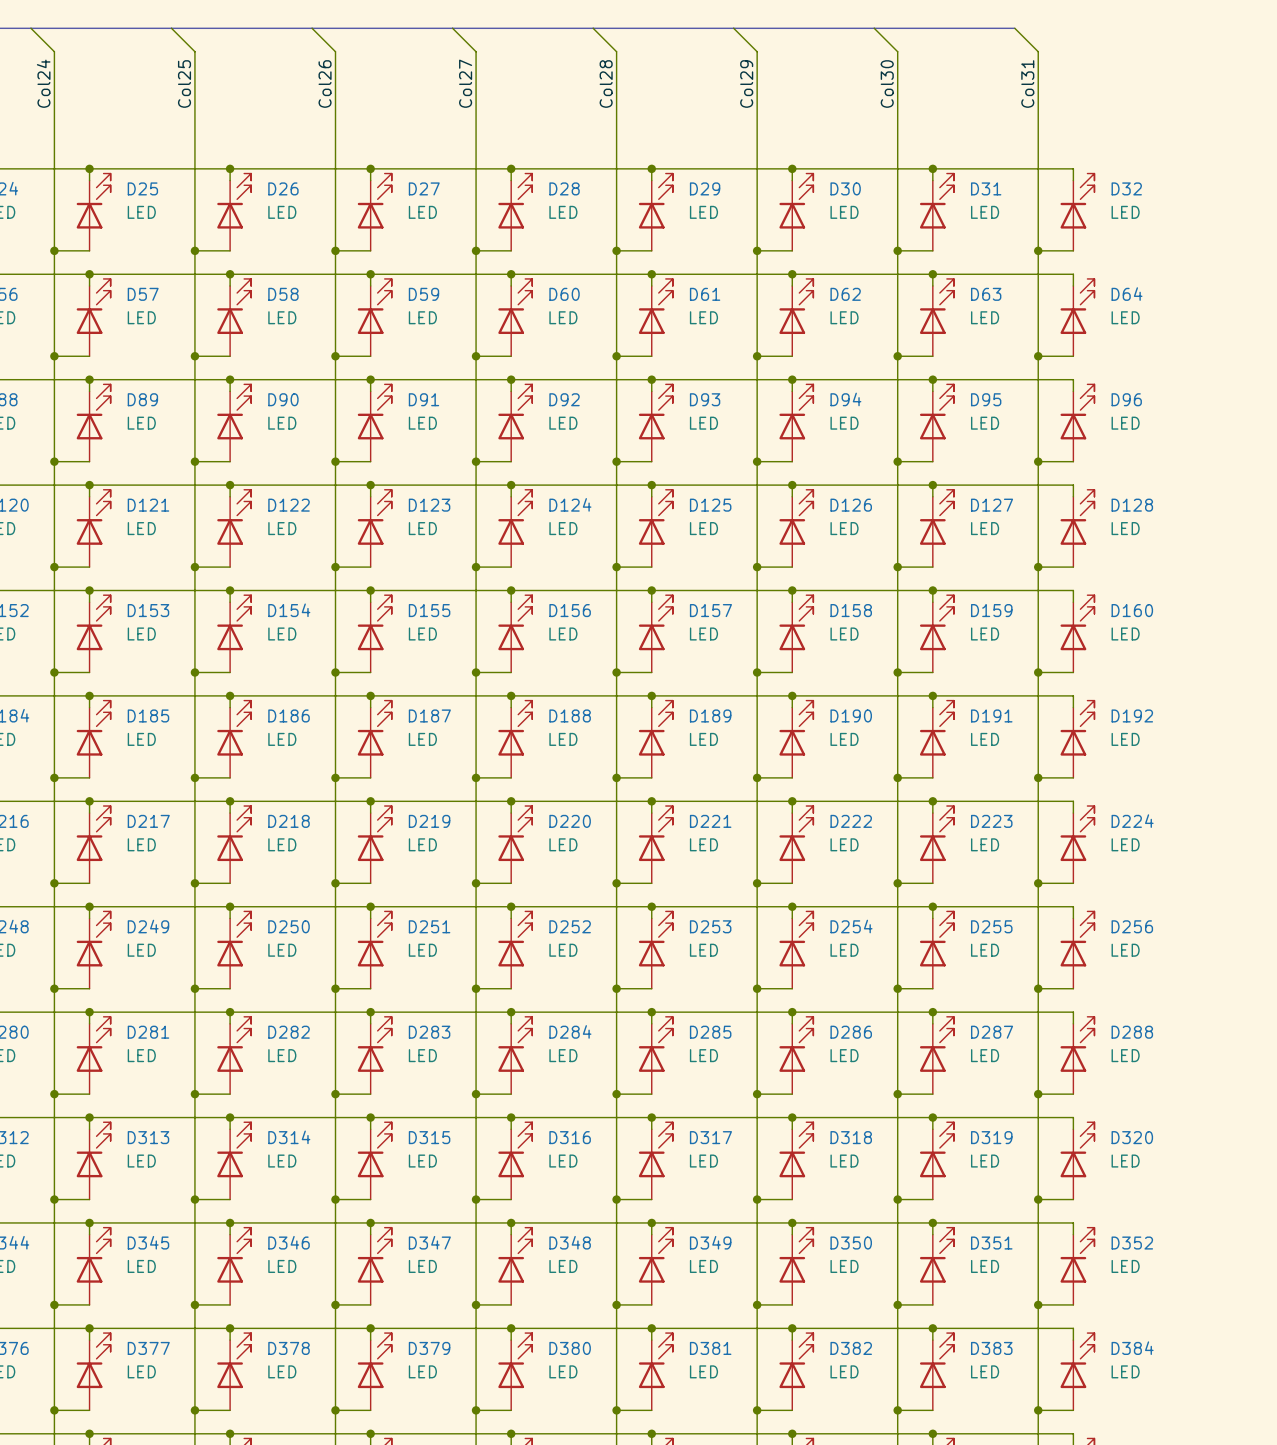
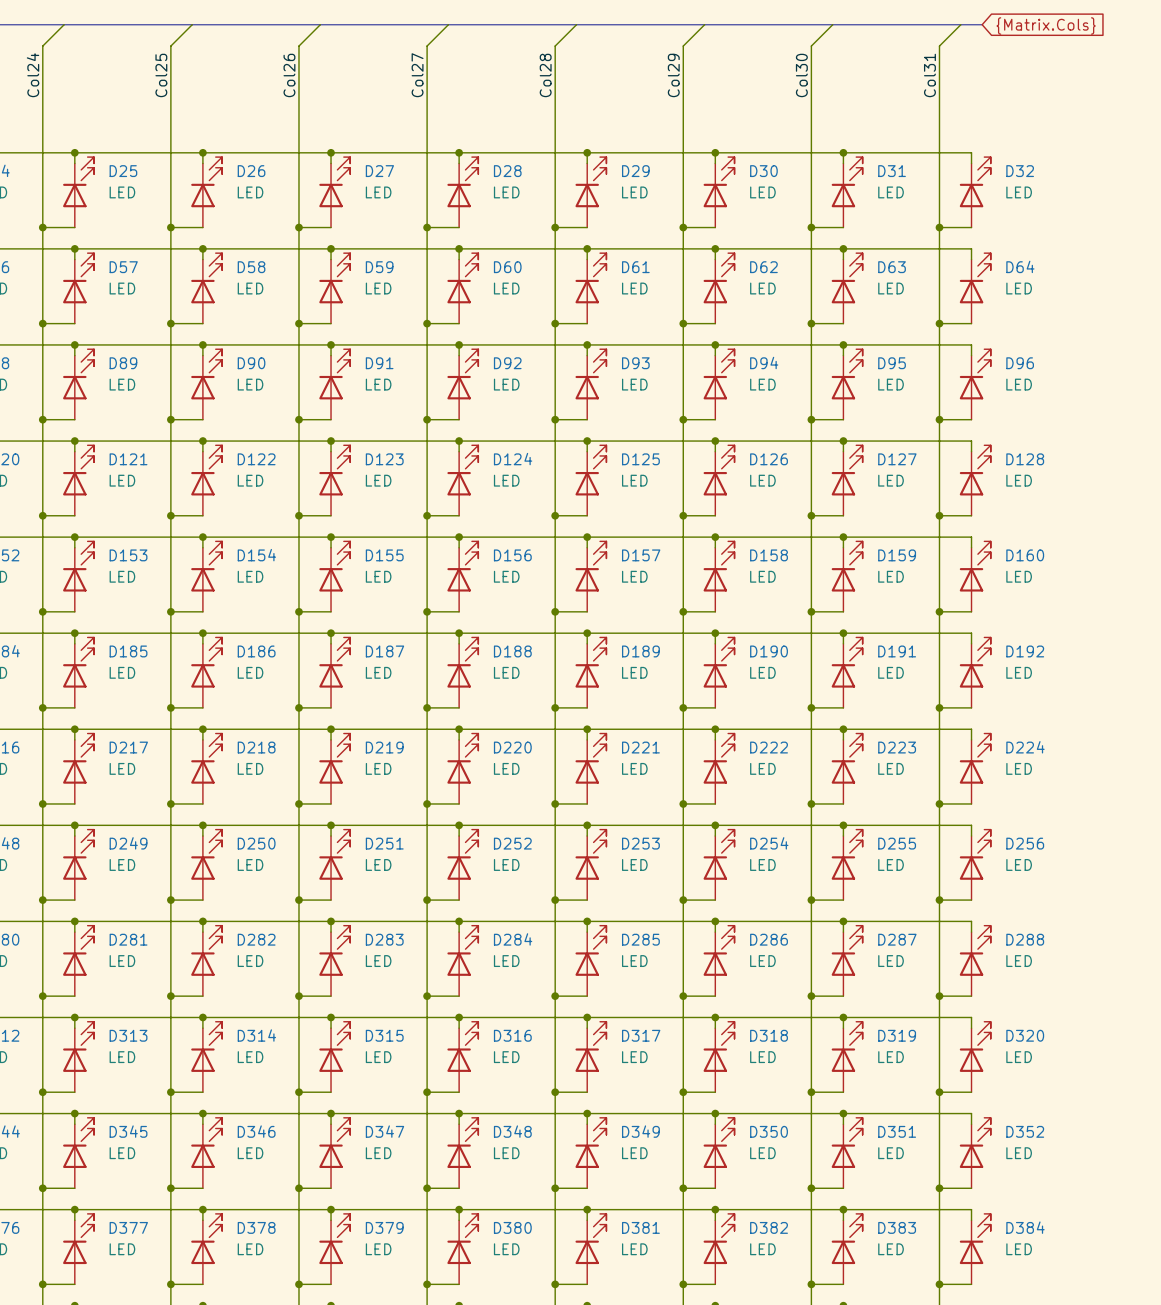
wire: (30, 28) (54, 51) -> (64, 24) (42, 46)
wire: (171, 28) (194, 51) -> (192, 24) (170, 46)
wire: (312, 28) (335, 51) -> (320, 24) (298, 46)
wire: (452, 28) (476, 51) -> (448, 24) (427, 46)
wire: (593, 28) (616, 51) -> (576, 24) (555, 46)
wire: (733, 28) (757, 51) -> (704, 24) (683, 46)
wire: (874, 28) (897, 51) -> (832, 24) (811, 46)
wire: (1014, 28) (1038, 51) -> (960, 24) (939, 46)
bus: none -> (918, 24) (982, 24)
global label: none -> {Matrix.Cols} (1046, 25)

